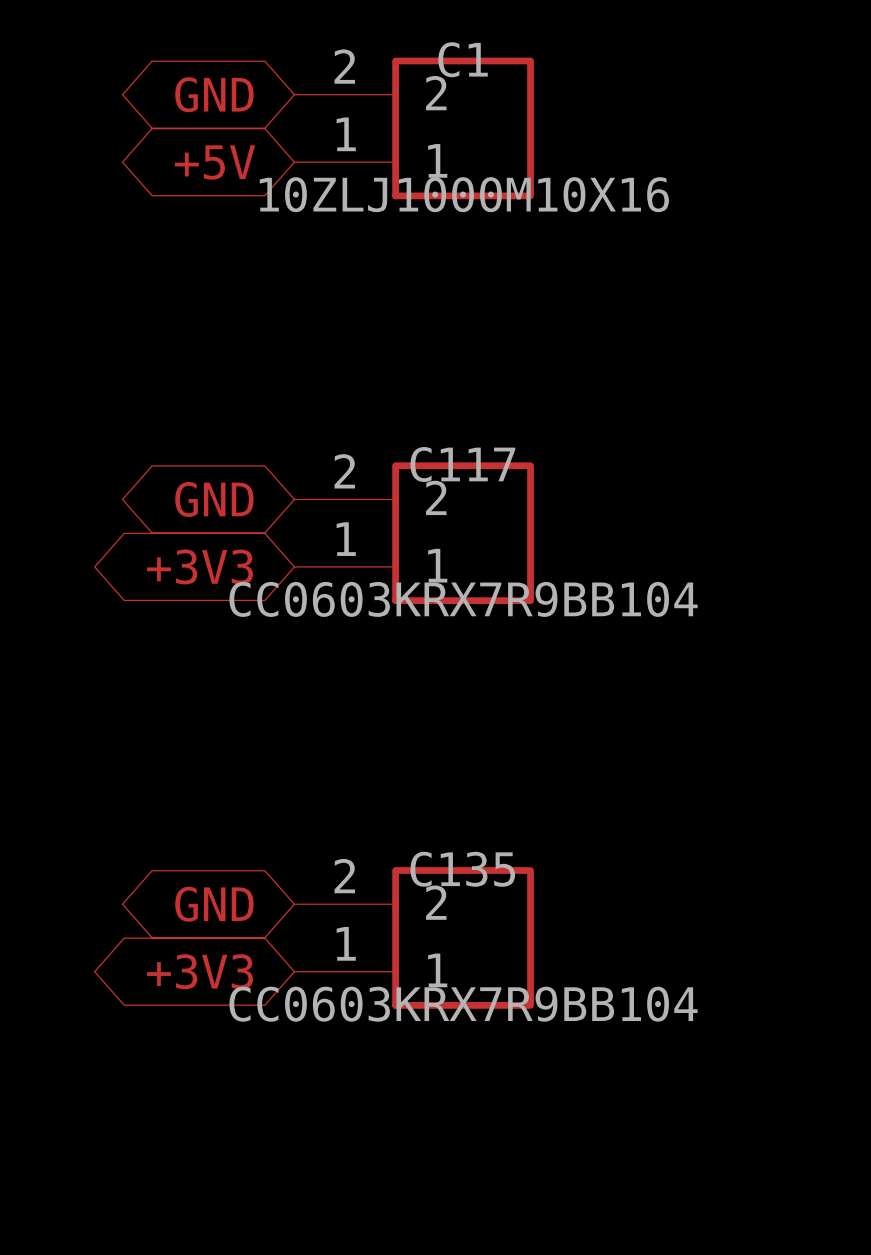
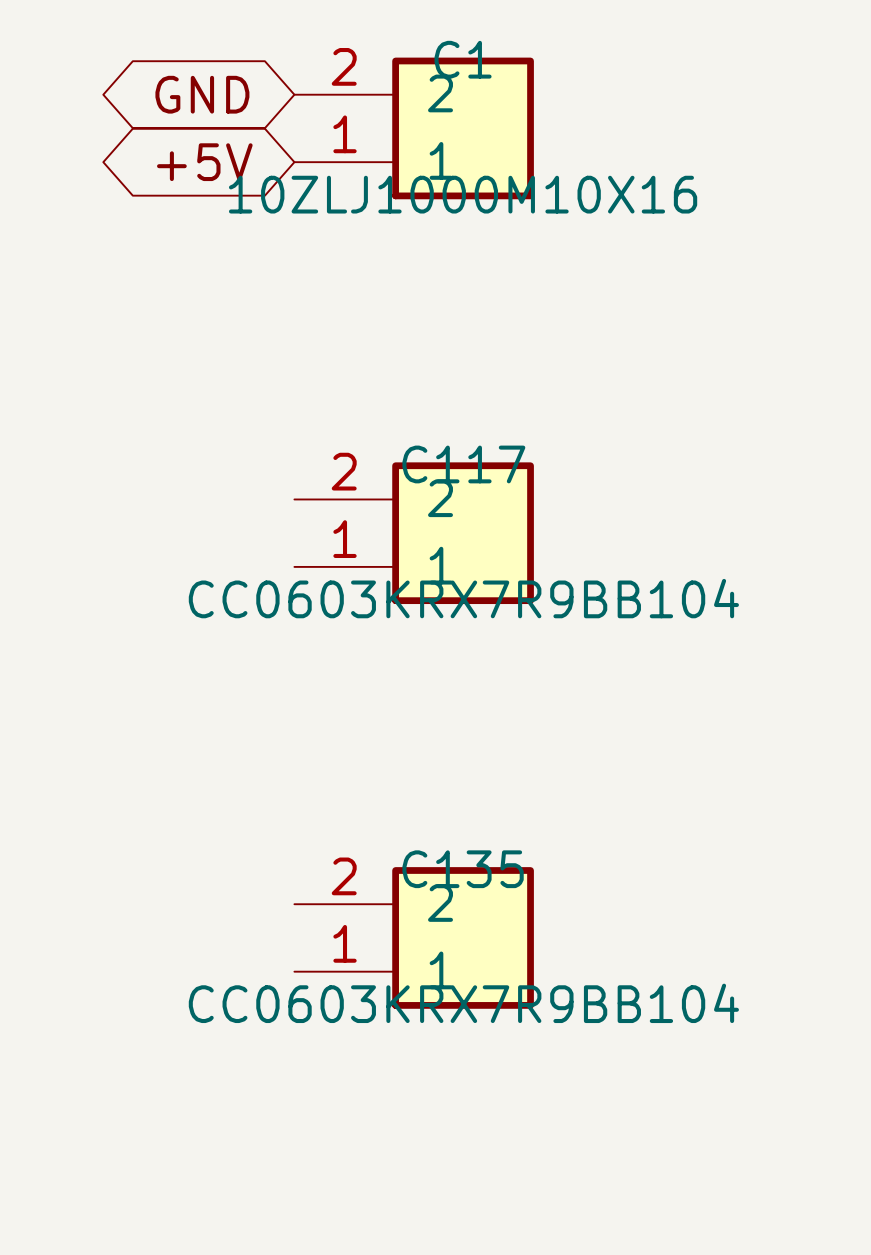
global label: GND (214, 499) -> none
global label: +3V3 (200, 566) -> none
global label: GND (214, 904) -> none
global label: +3V3 (200, 971) -> none

